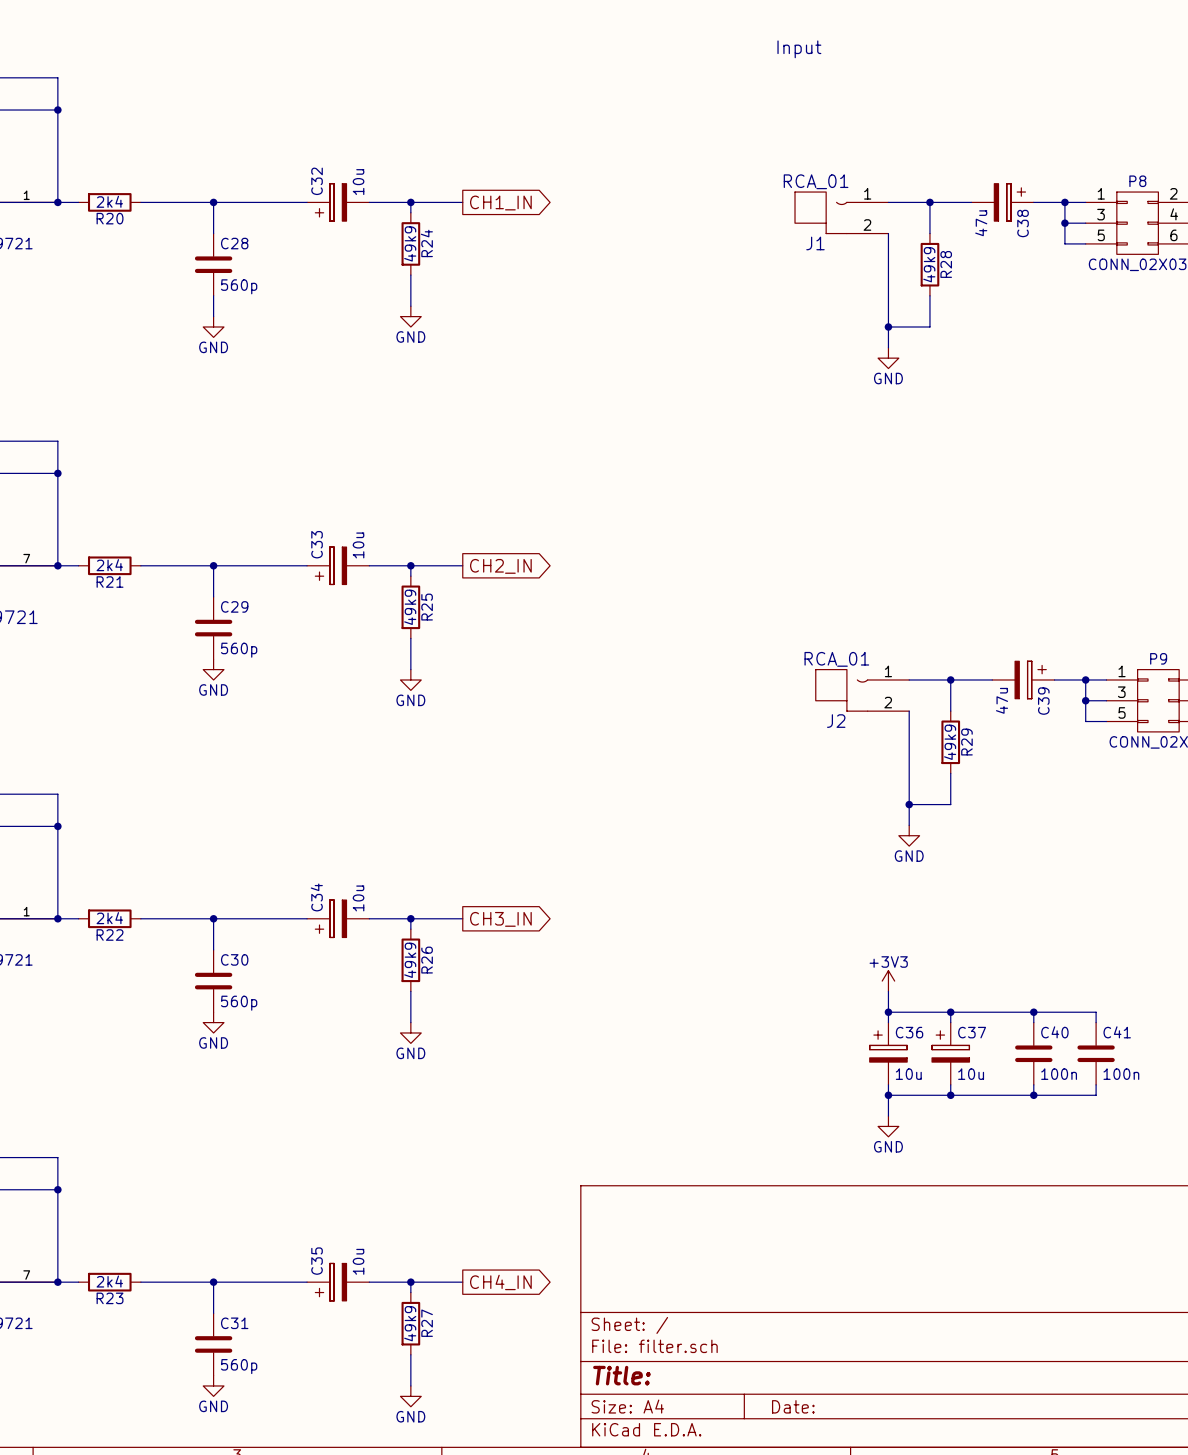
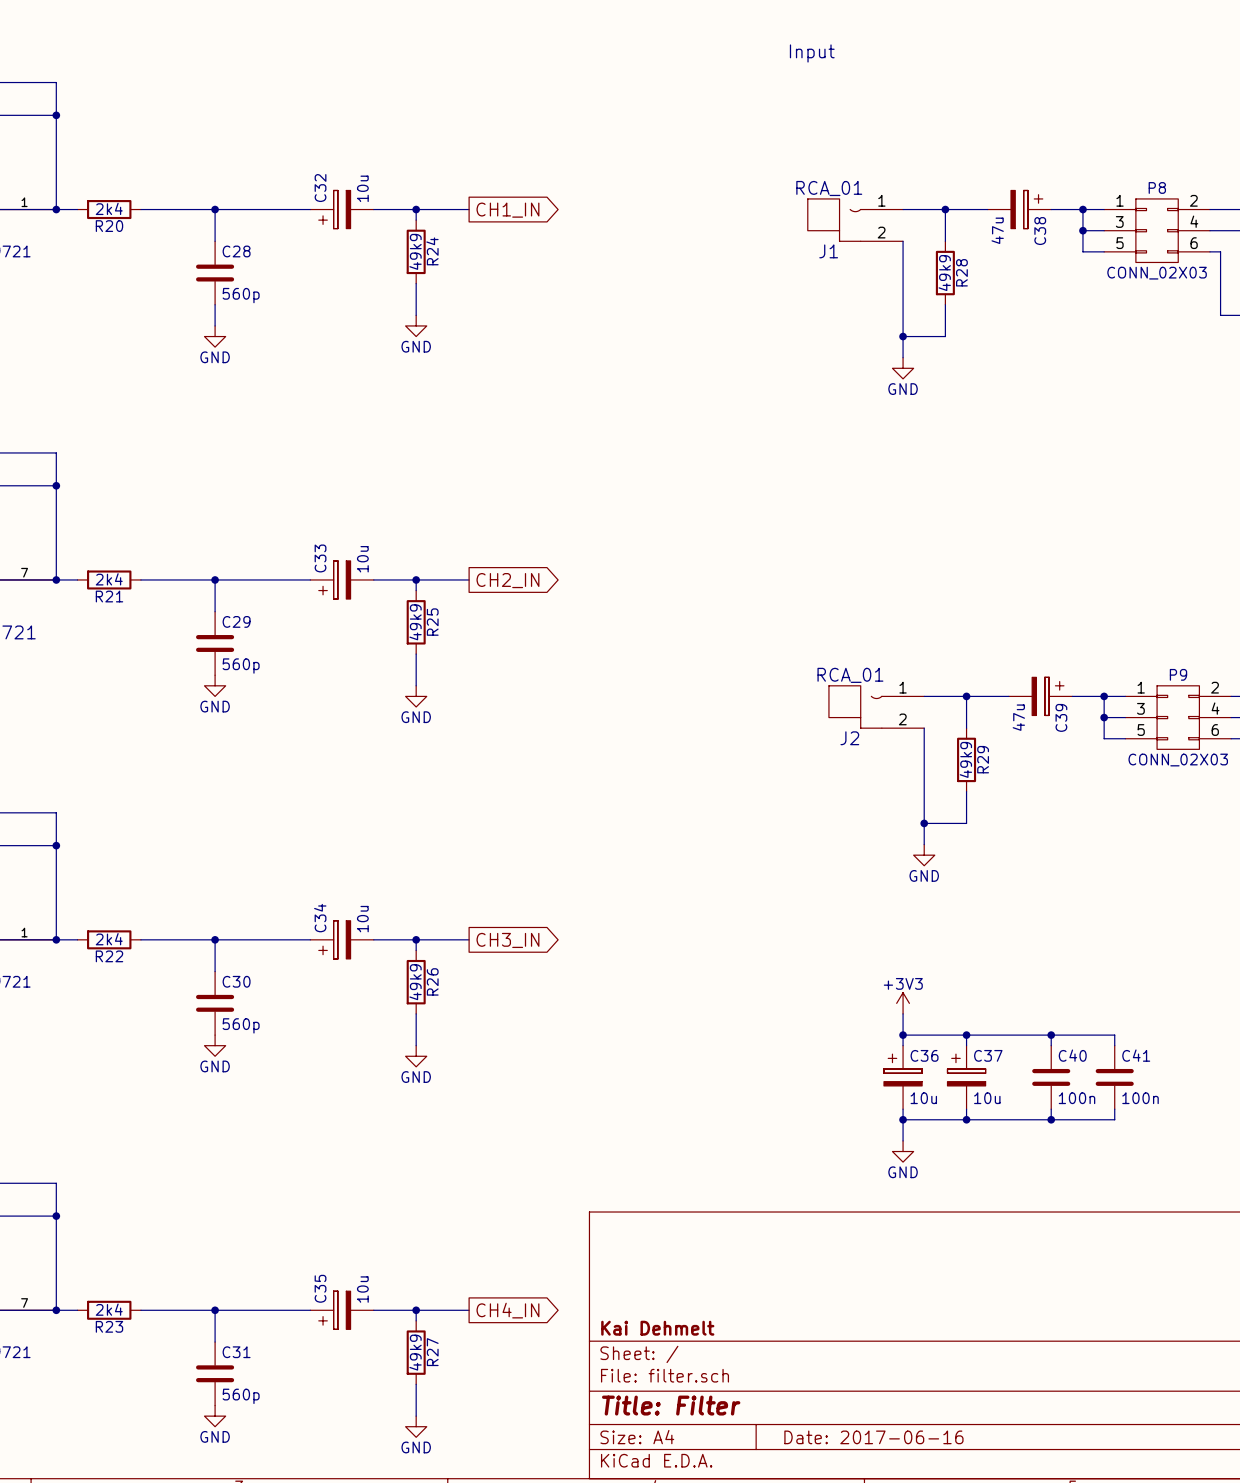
title block: none -> Kai Dehmelt (657, 1328)
title block: Title: (621, 1375) -> Title: Filter (671, 1405)
title block: Date: (793, 1406) -> Date: 2017-06-16 (873, 1437)

